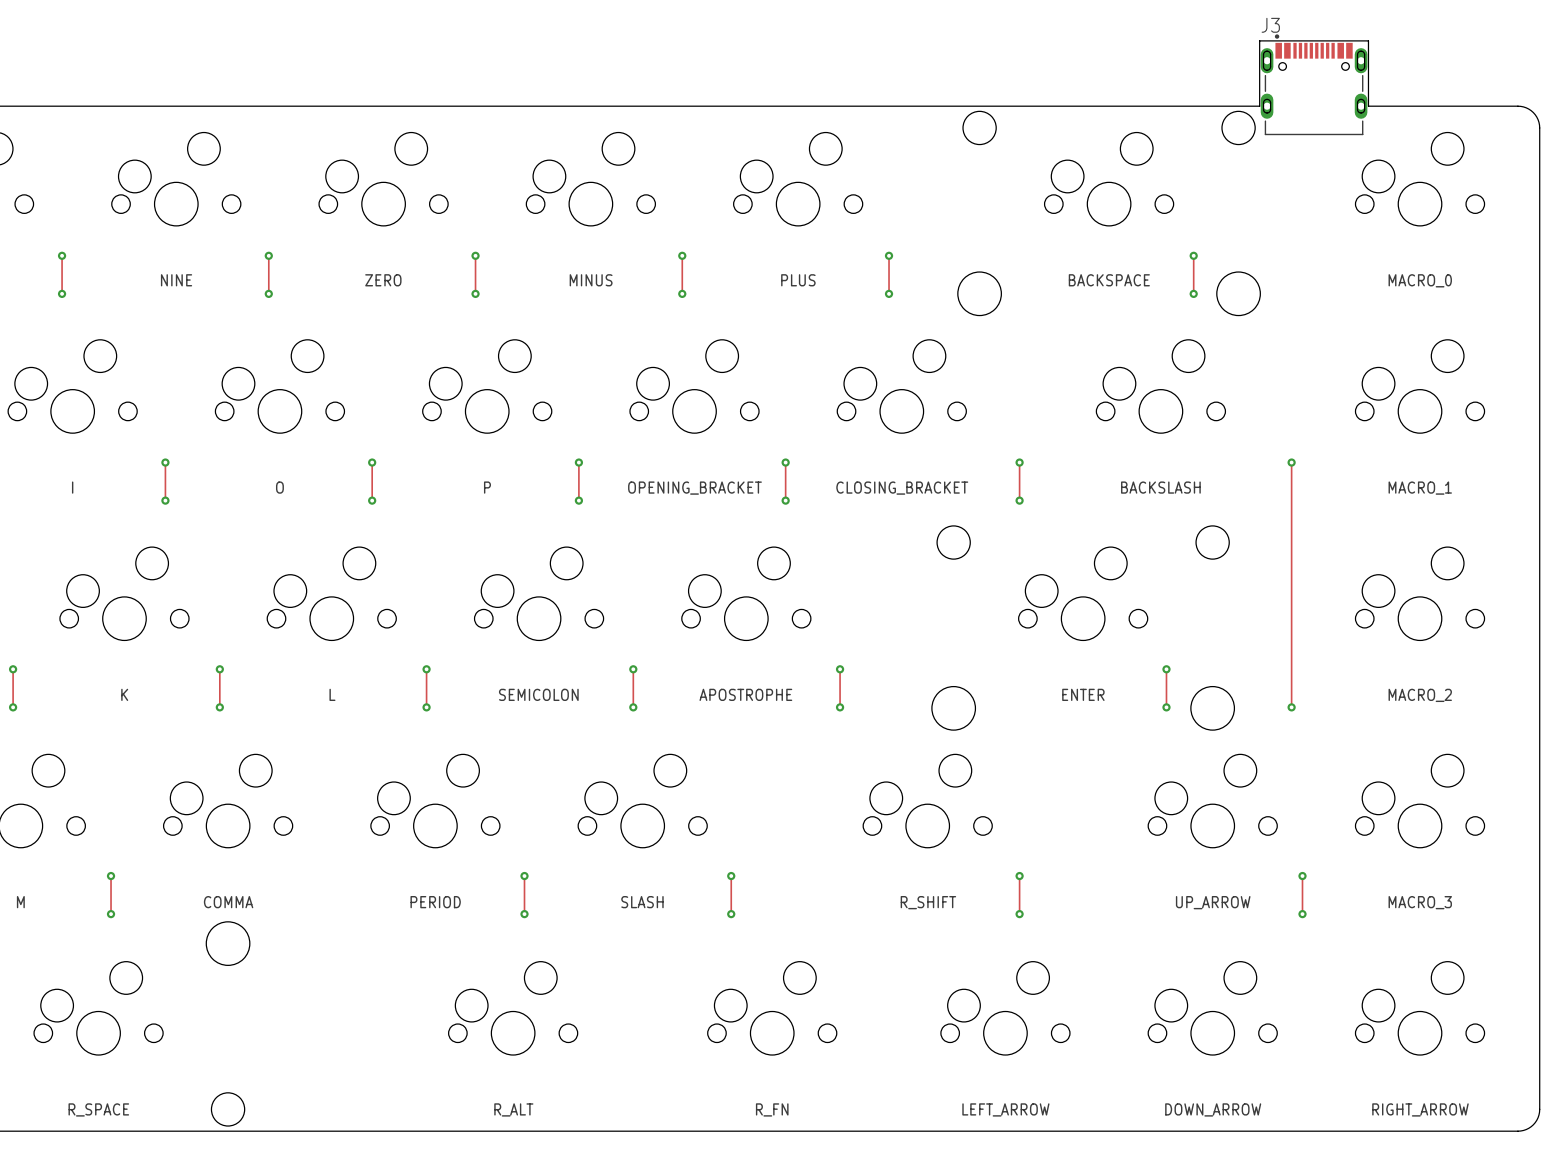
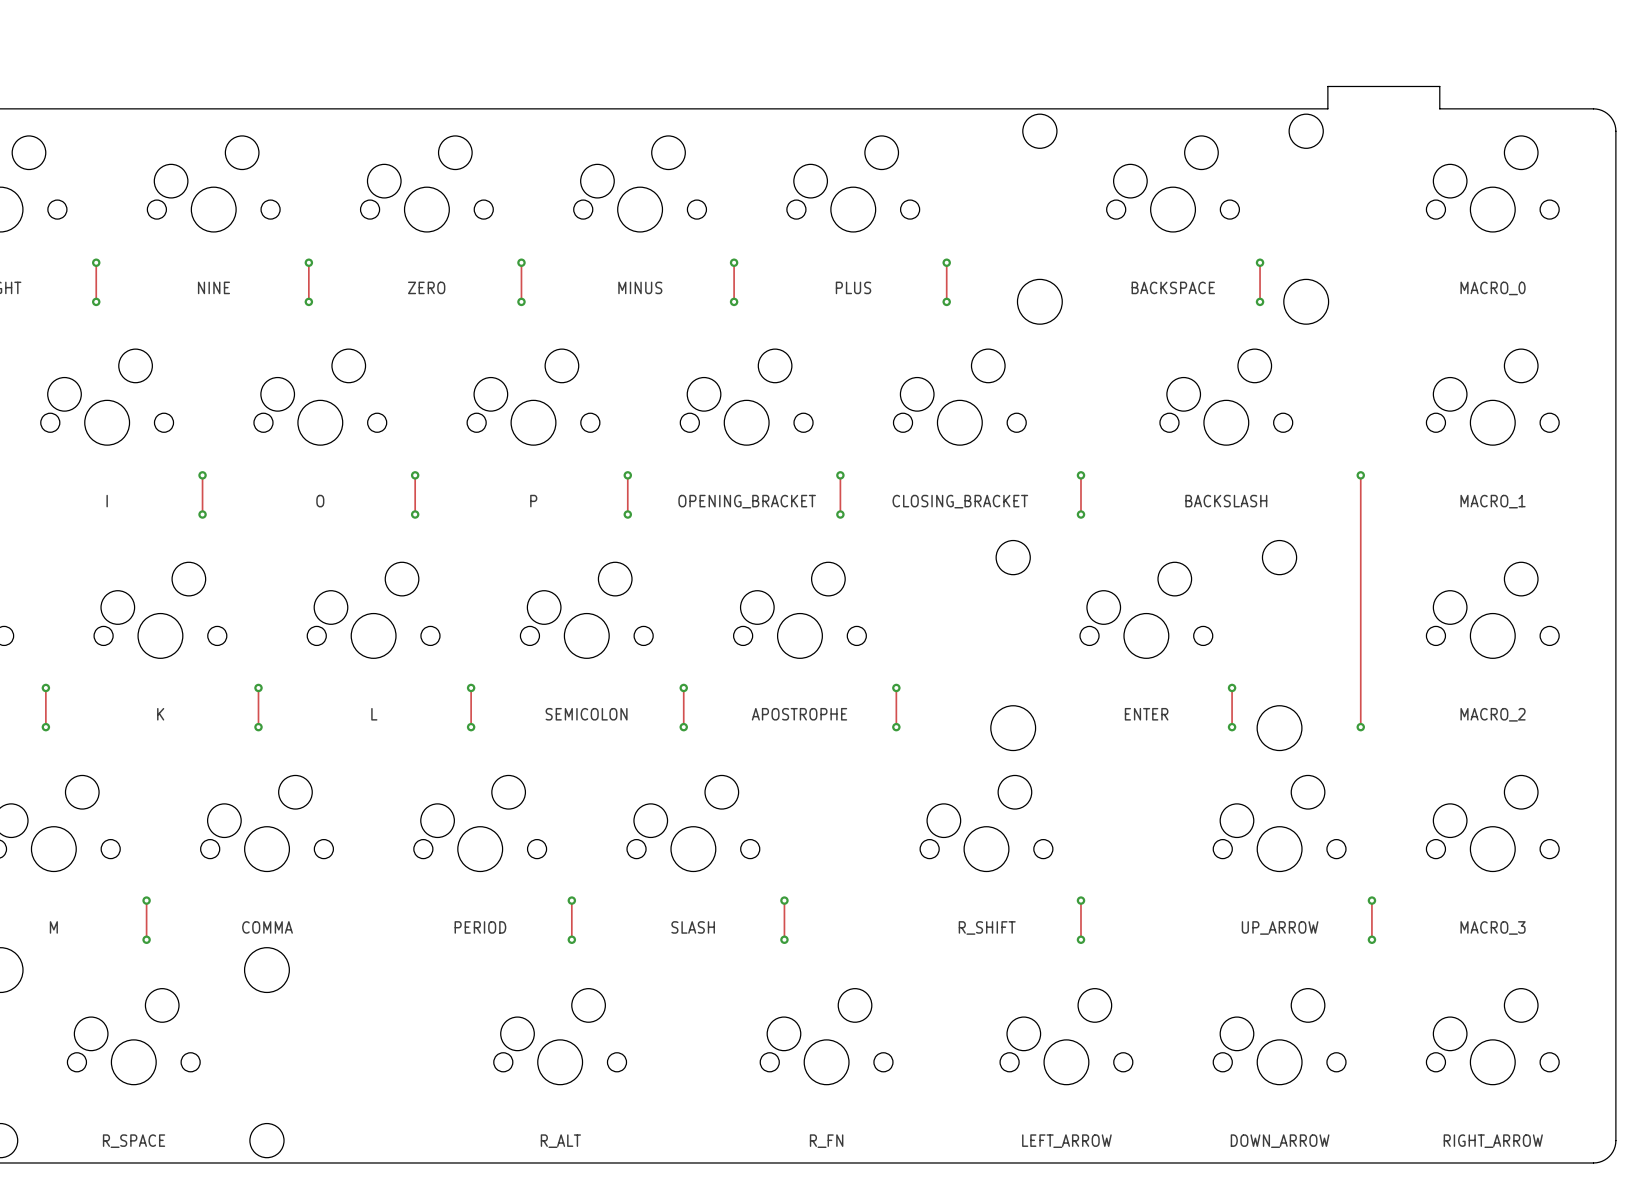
board edge: (1259, 84) (1259, 40) (1368, 40) (1368, 84) -> (1327, 86) (1439, 86)
J3: (1314, 84) -> none

